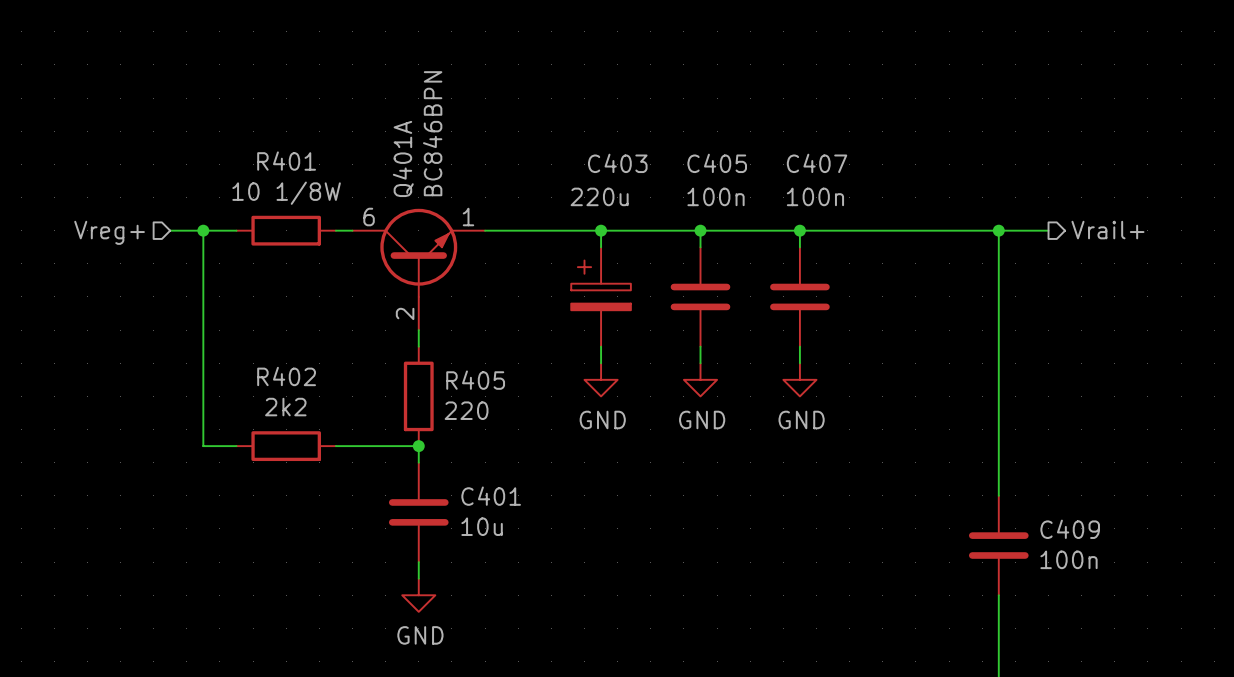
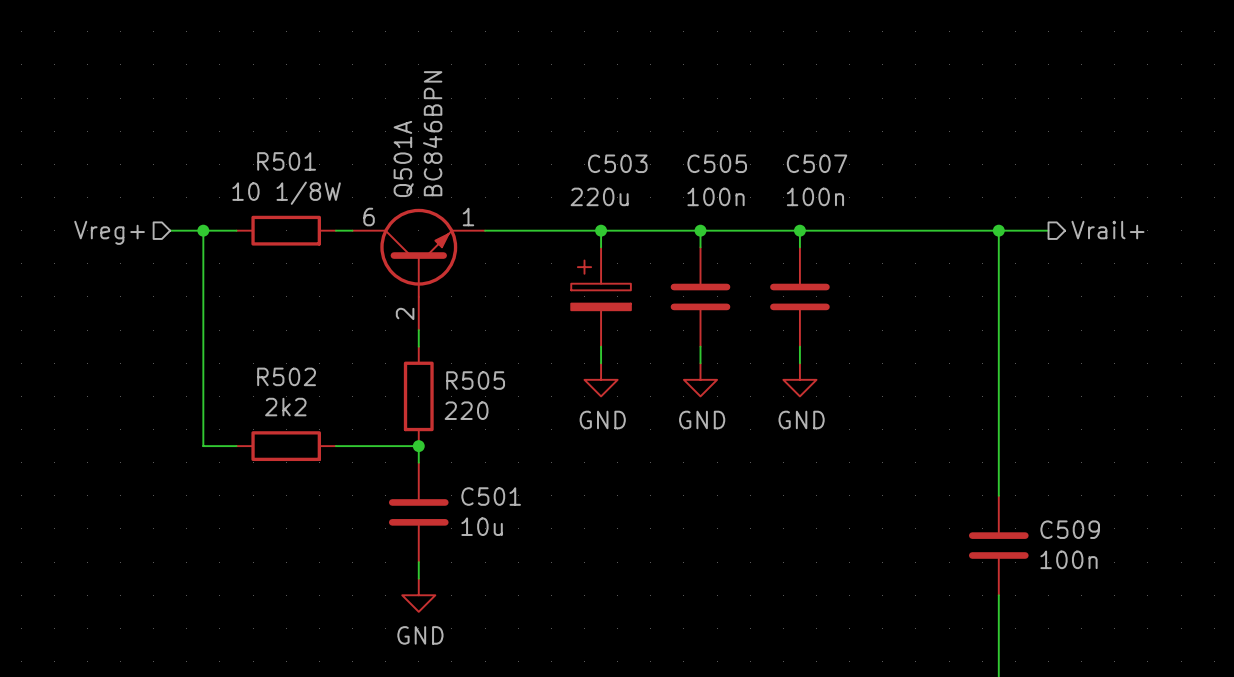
Q401A name: Q401A (403, 158) -> Q501A (403, 158)
R401 name: R401 (286, 161) -> R501 (286, 161)
C403 name: C403 (617, 163) -> C503 (617, 163)
C405 name: C405 (717, 163) -> C505 (717, 163)
C407 name: C407 (817, 163) -> C507 (817, 163)
R402 name: R402 (286, 376) -> R502 (286, 376)
R405 name: R405 (475, 380) -> R505 (475, 380)
C401 name: C401 (491, 496) -> C501 (491, 496)
C409 name: C409 (1070, 529) -> C509 (1070, 529)

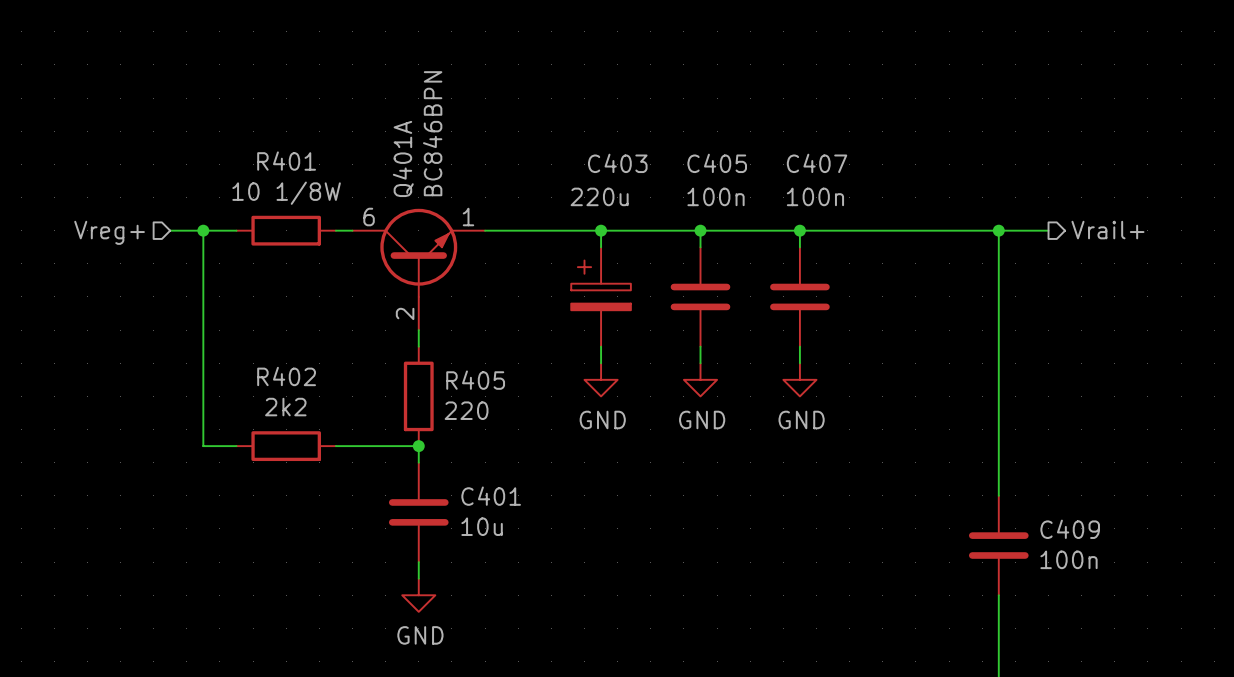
Q501A name: Q501A (403, 158) -> Q401A (403, 158)
R501 name: R501 (286, 161) -> R401 (286, 161)
C503 name: C503 (617, 163) -> C403 (617, 163)
C505 name: C505 (717, 163) -> C405 (717, 163)
C507 name: C507 (817, 163) -> C407 (817, 163)
R502 name: R502 (286, 376) -> R402 (286, 376)
R505 name: R505 (475, 380) -> R405 (475, 380)
C501 name: C501 (491, 496) -> C401 (491, 496)
C509 name: C509 (1070, 529) -> C409 (1070, 529)

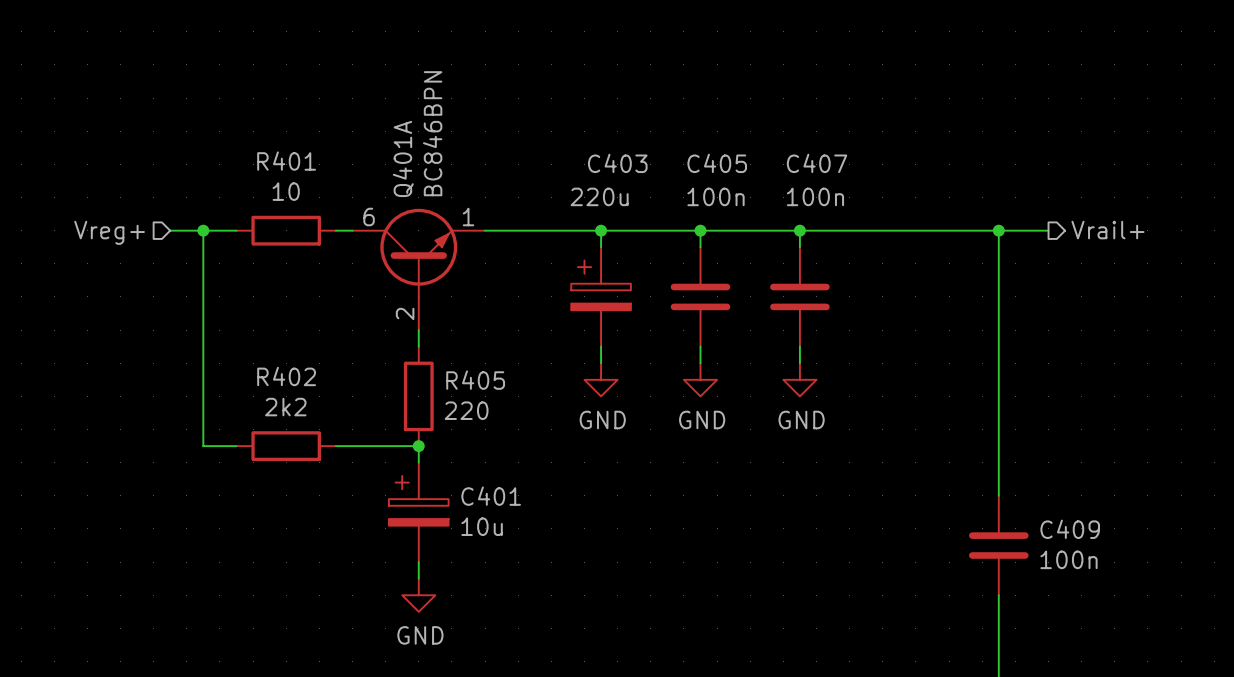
R401 value: 10 1/8W (286, 193) -> 10 (286, 191)
C401 symbol: [388, 462, 449, 563] -> [388, 462, 449, 563]

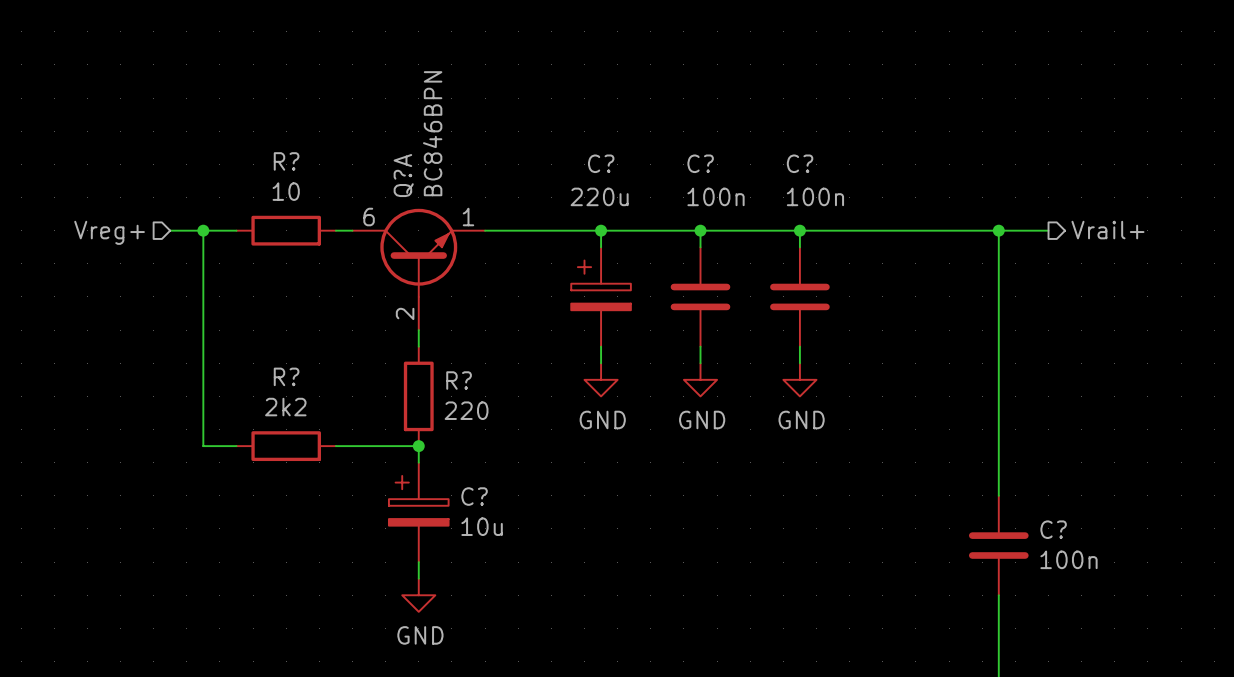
Q401A name: Q401A (403, 158) -> Q?A (403, 175)
R401 name: R401 (286, 161) -> R? (286, 161)
C403 name: C403 (617, 163) -> C? (601, 163)
C405 name: C405 (717, 163) -> C? (700, 163)
C407 name: C407 (817, 163) -> C? (800, 163)
R402 name: R402 (286, 376) -> R? (286, 376)
R405 name: R405 (475, 380) -> R? (459, 380)
C401 name: C401 (491, 496) -> C? (474, 496)
C409 name: C409 (1070, 529) -> C? (1053, 529)

